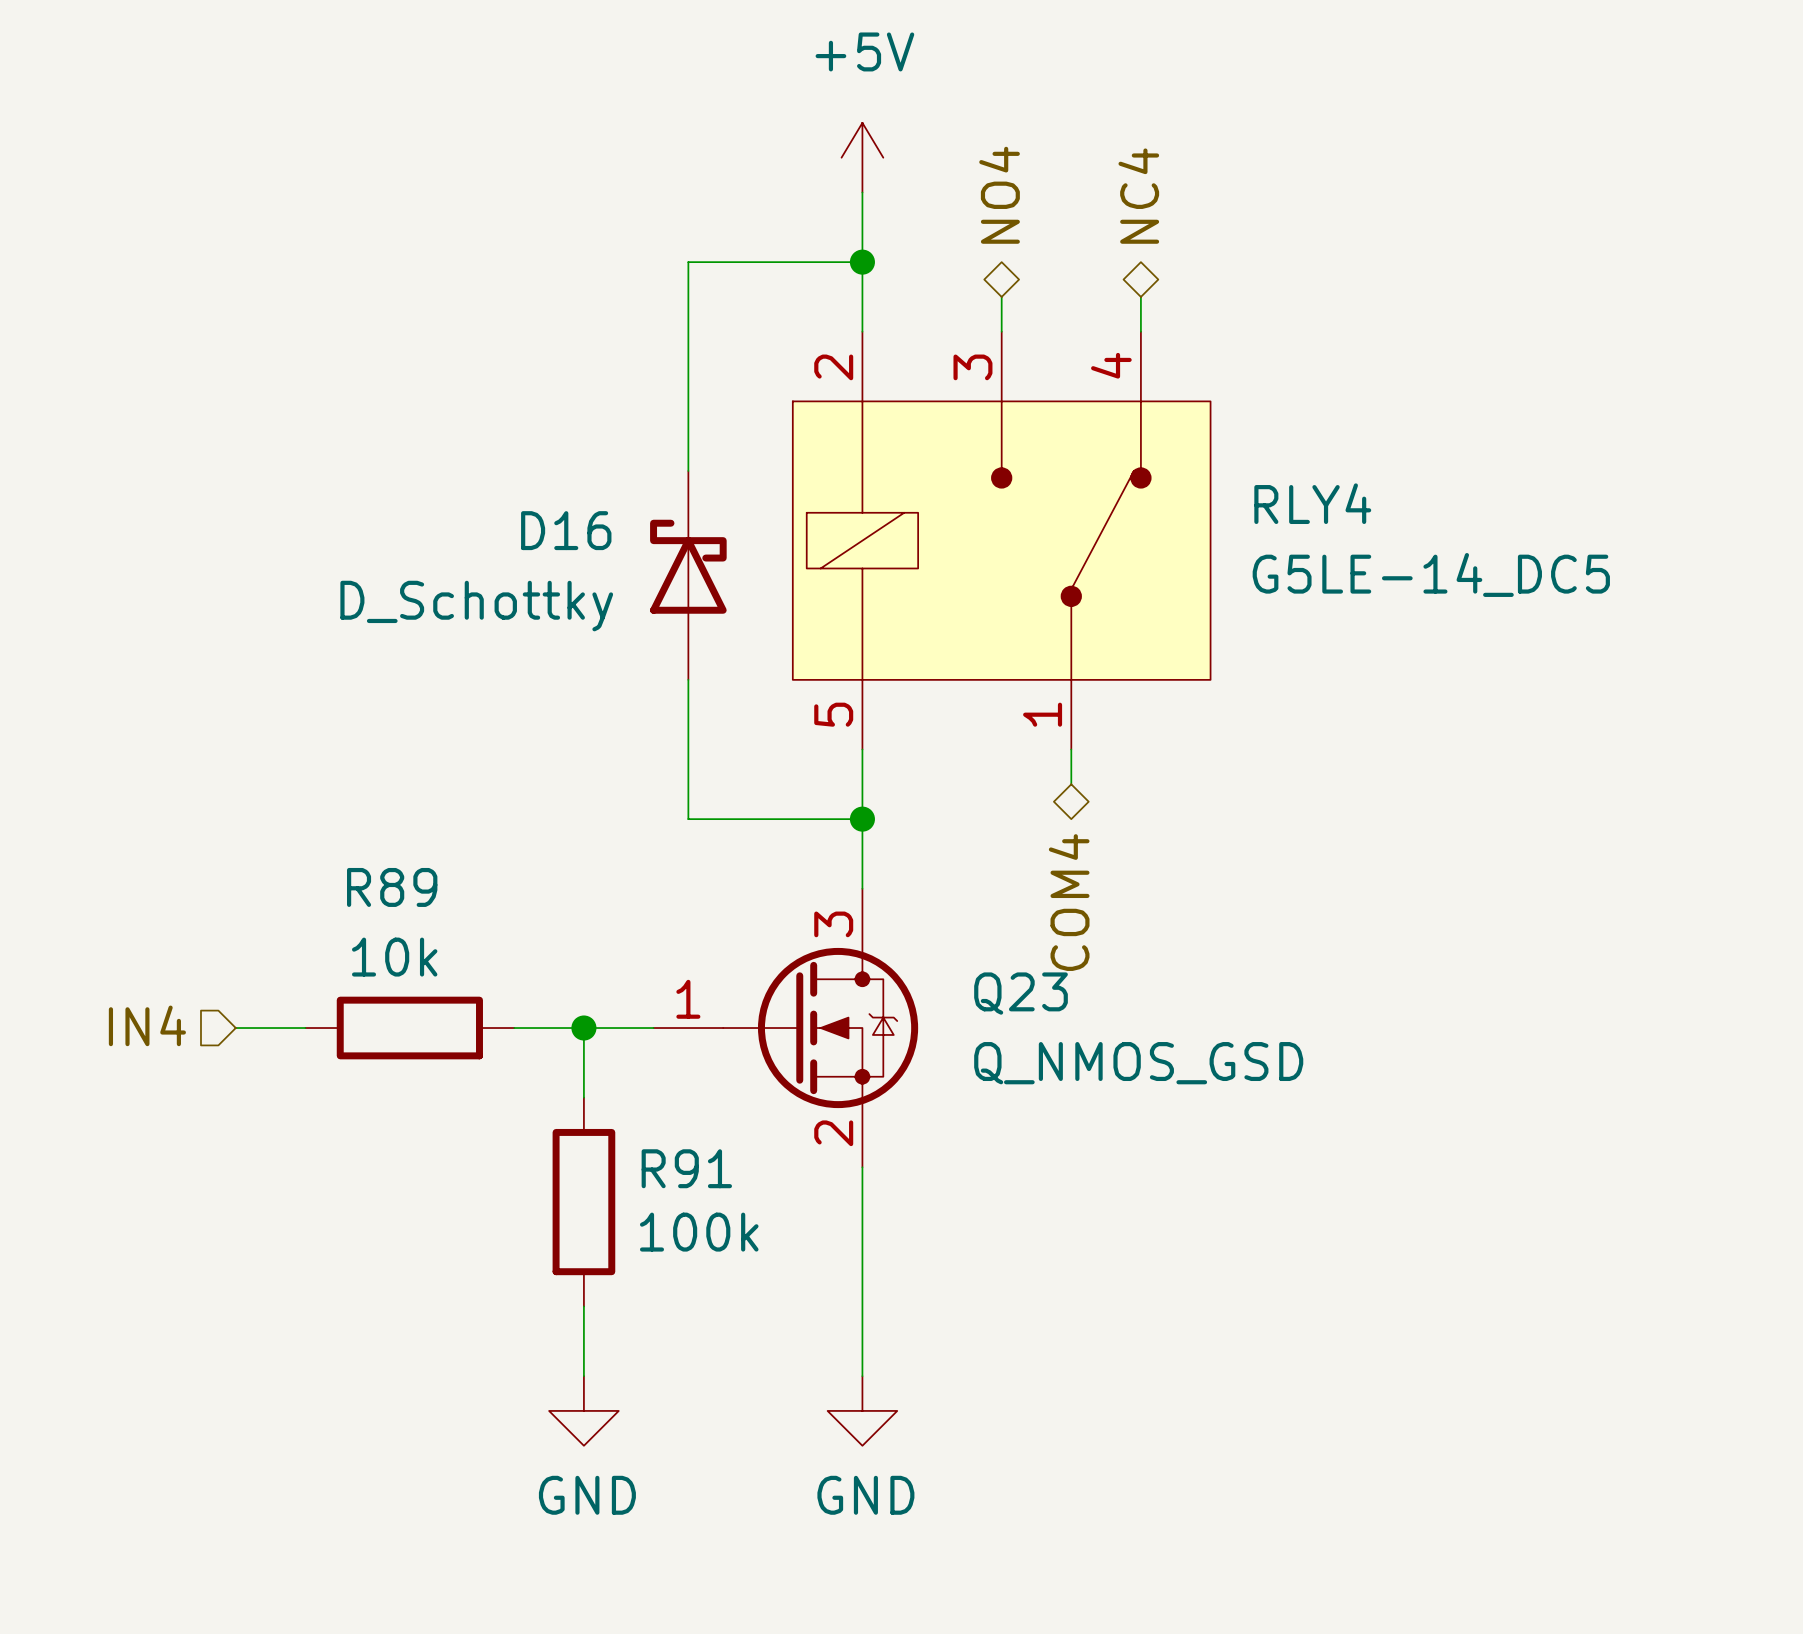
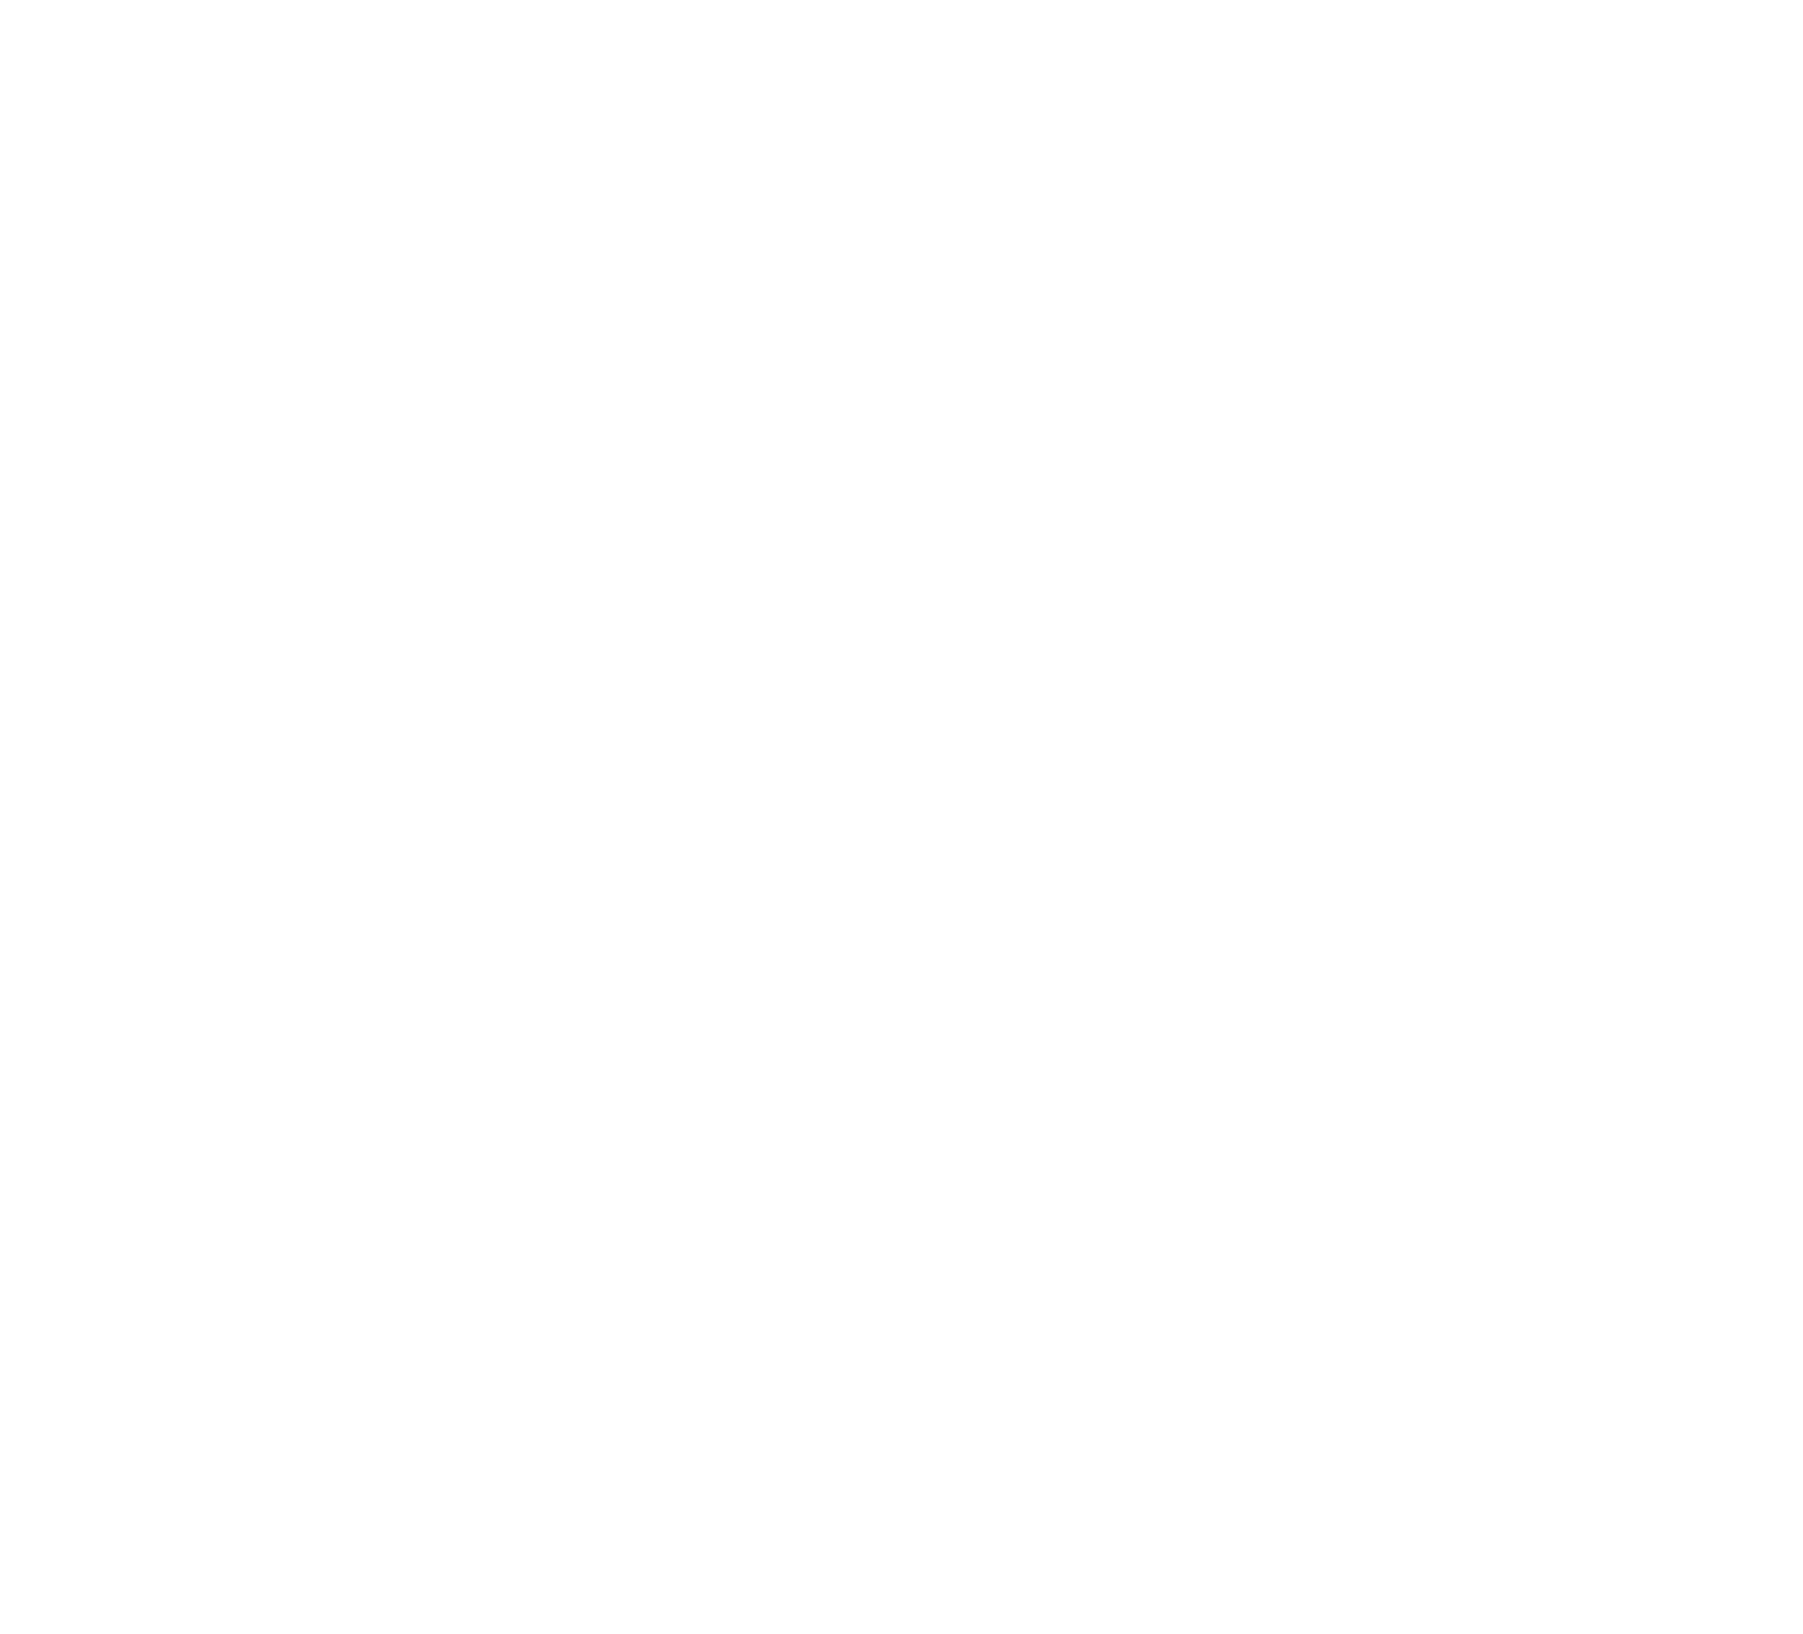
power symbol: +5V (862, 157) -> none
wire: (862, 192) (862, 331) -> none
hierarchical label: NO4 (999, 195) -> none
hierarchical label: NC4 (1138, 196) -> none
wire: (862, 262) (688, 262) (688, 471) -> none
junction: (862, 262) -> none
wire: (1001, 296) (1001, 331) -> none
wire: (1140, 296) (1140, 331) -> none
RLY4: G5LE-14_DC5 (1001, 540) -> none
D16: D_Schottky (688, 575) -> none
wire: (688, 679) (688, 819) (862, 819) -> none
wire: (862, 749) (862, 888) -> none
wire: (1071, 749) (1071, 784) -> none
junction: (862, 819) -> none
hierarchical label: COM4 (1069, 902) -> none
hierarchical label: IN4 (147, 1025) -> none
wire: (235, 1028) (305, 1028) -> none
R89: 10k (409, 1028) -> none
wire: (514, 1028) (653, 1028) -> none
wire: (583, 1028) (583, 1097) -> none
junction: (583, 1028) -> none
Q23: Q_NMOS_GSD (785, 1028) -> none
wire: (862, 1167) (862, 1376) -> none
R91: 100k (583, 1202) -> none
wire: (583, 1306) (583, 1376) -> none
power symbol: GND (583, 1410) -> none
power symbol: GND (862, 1410) -> none

